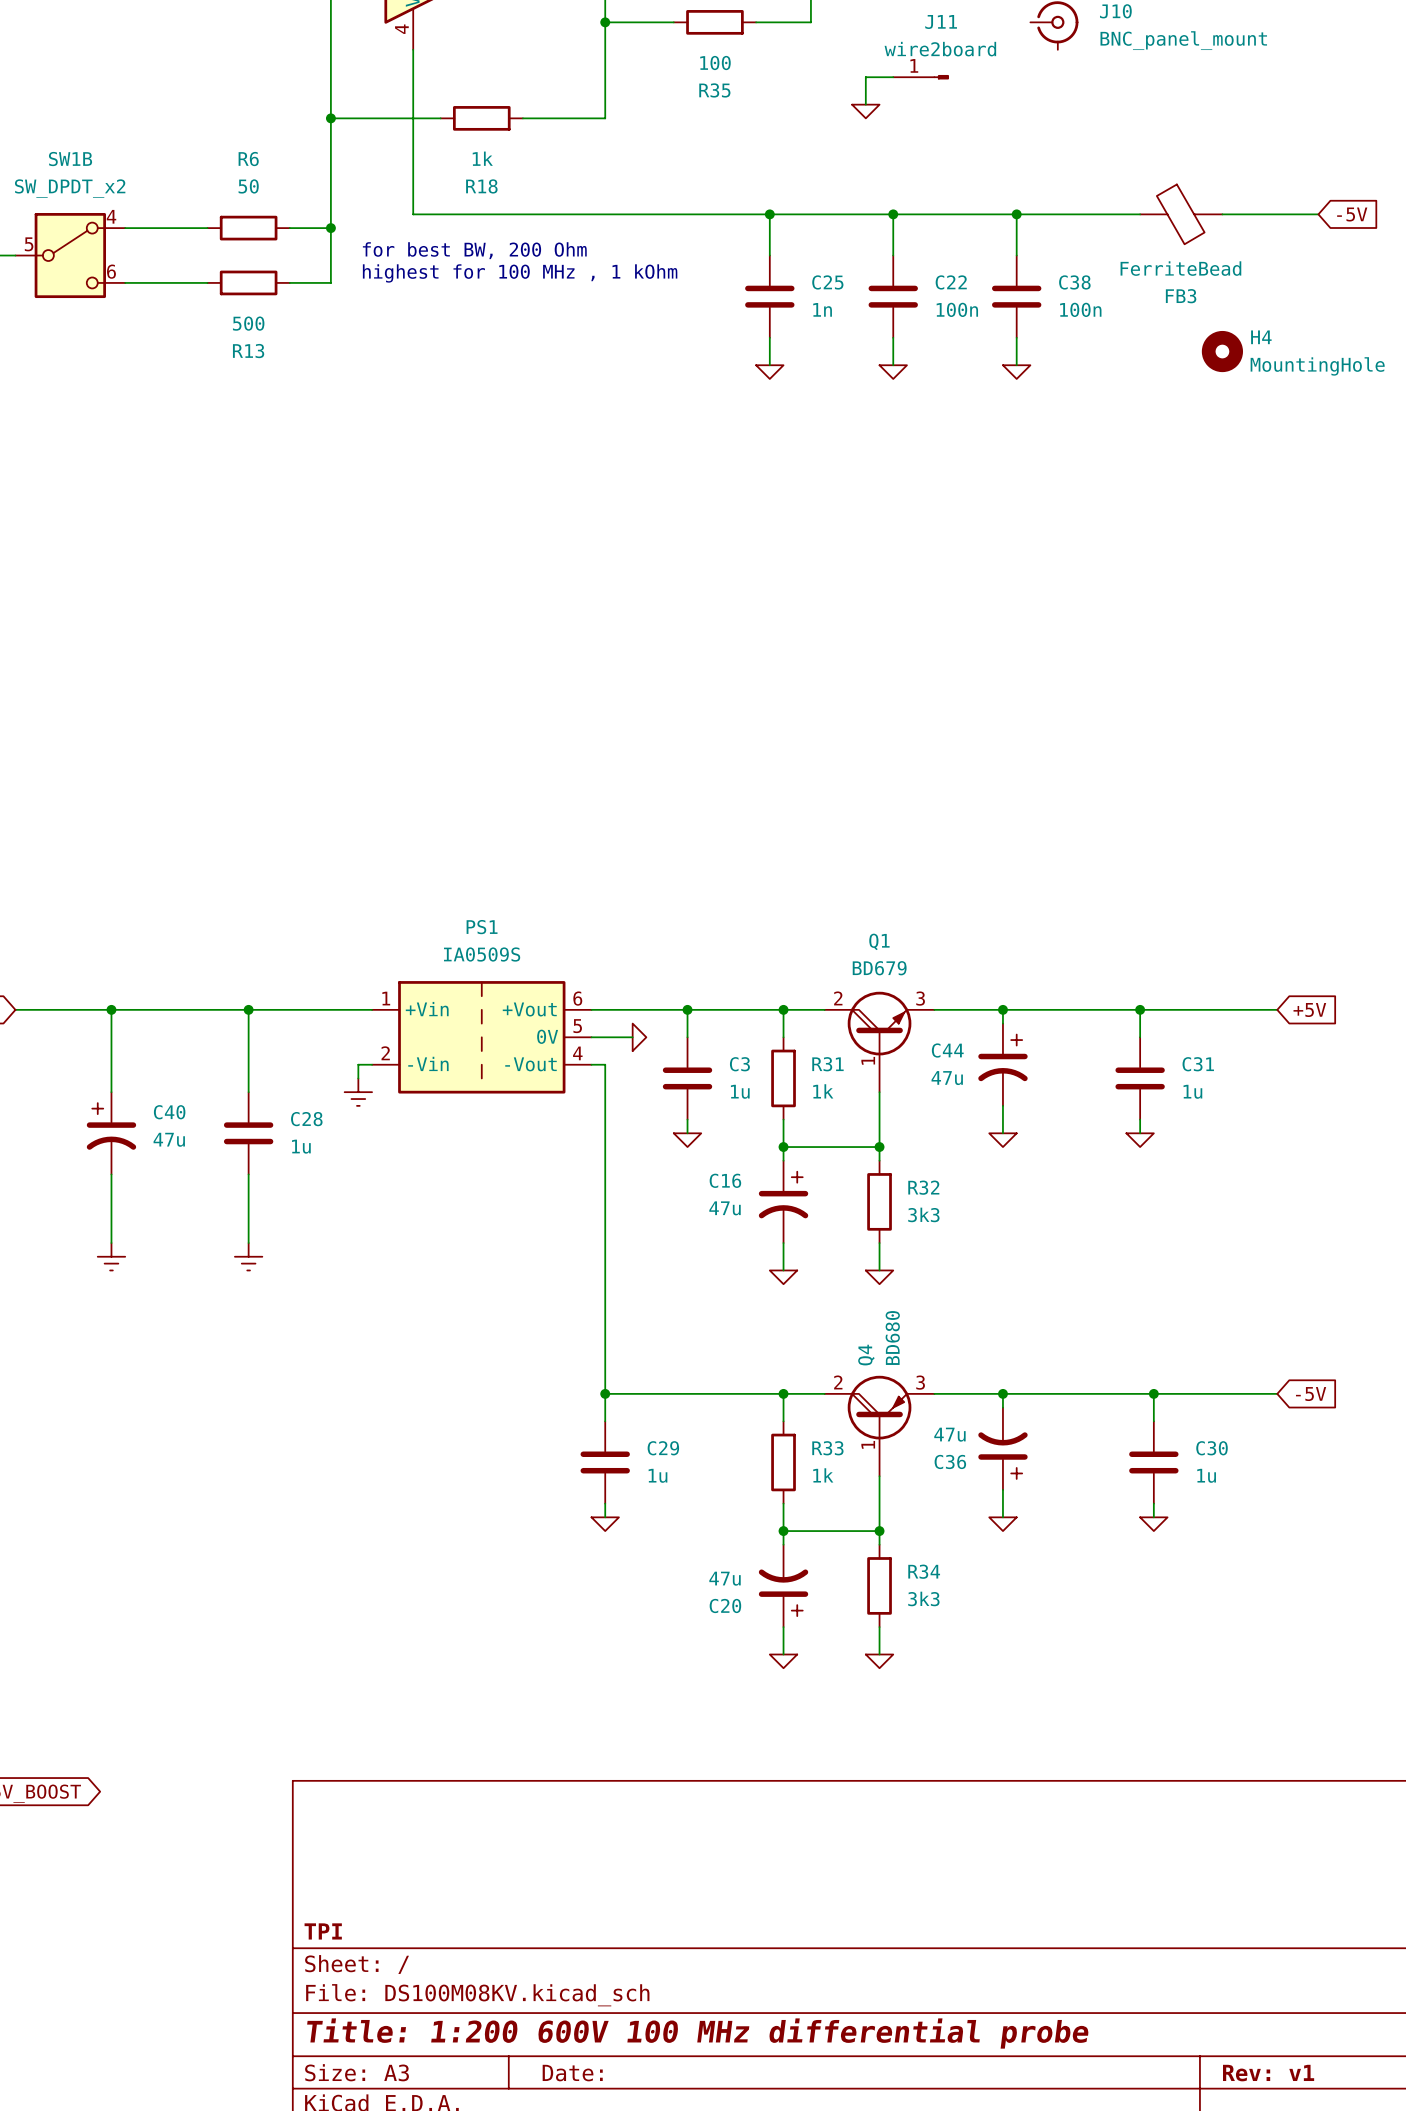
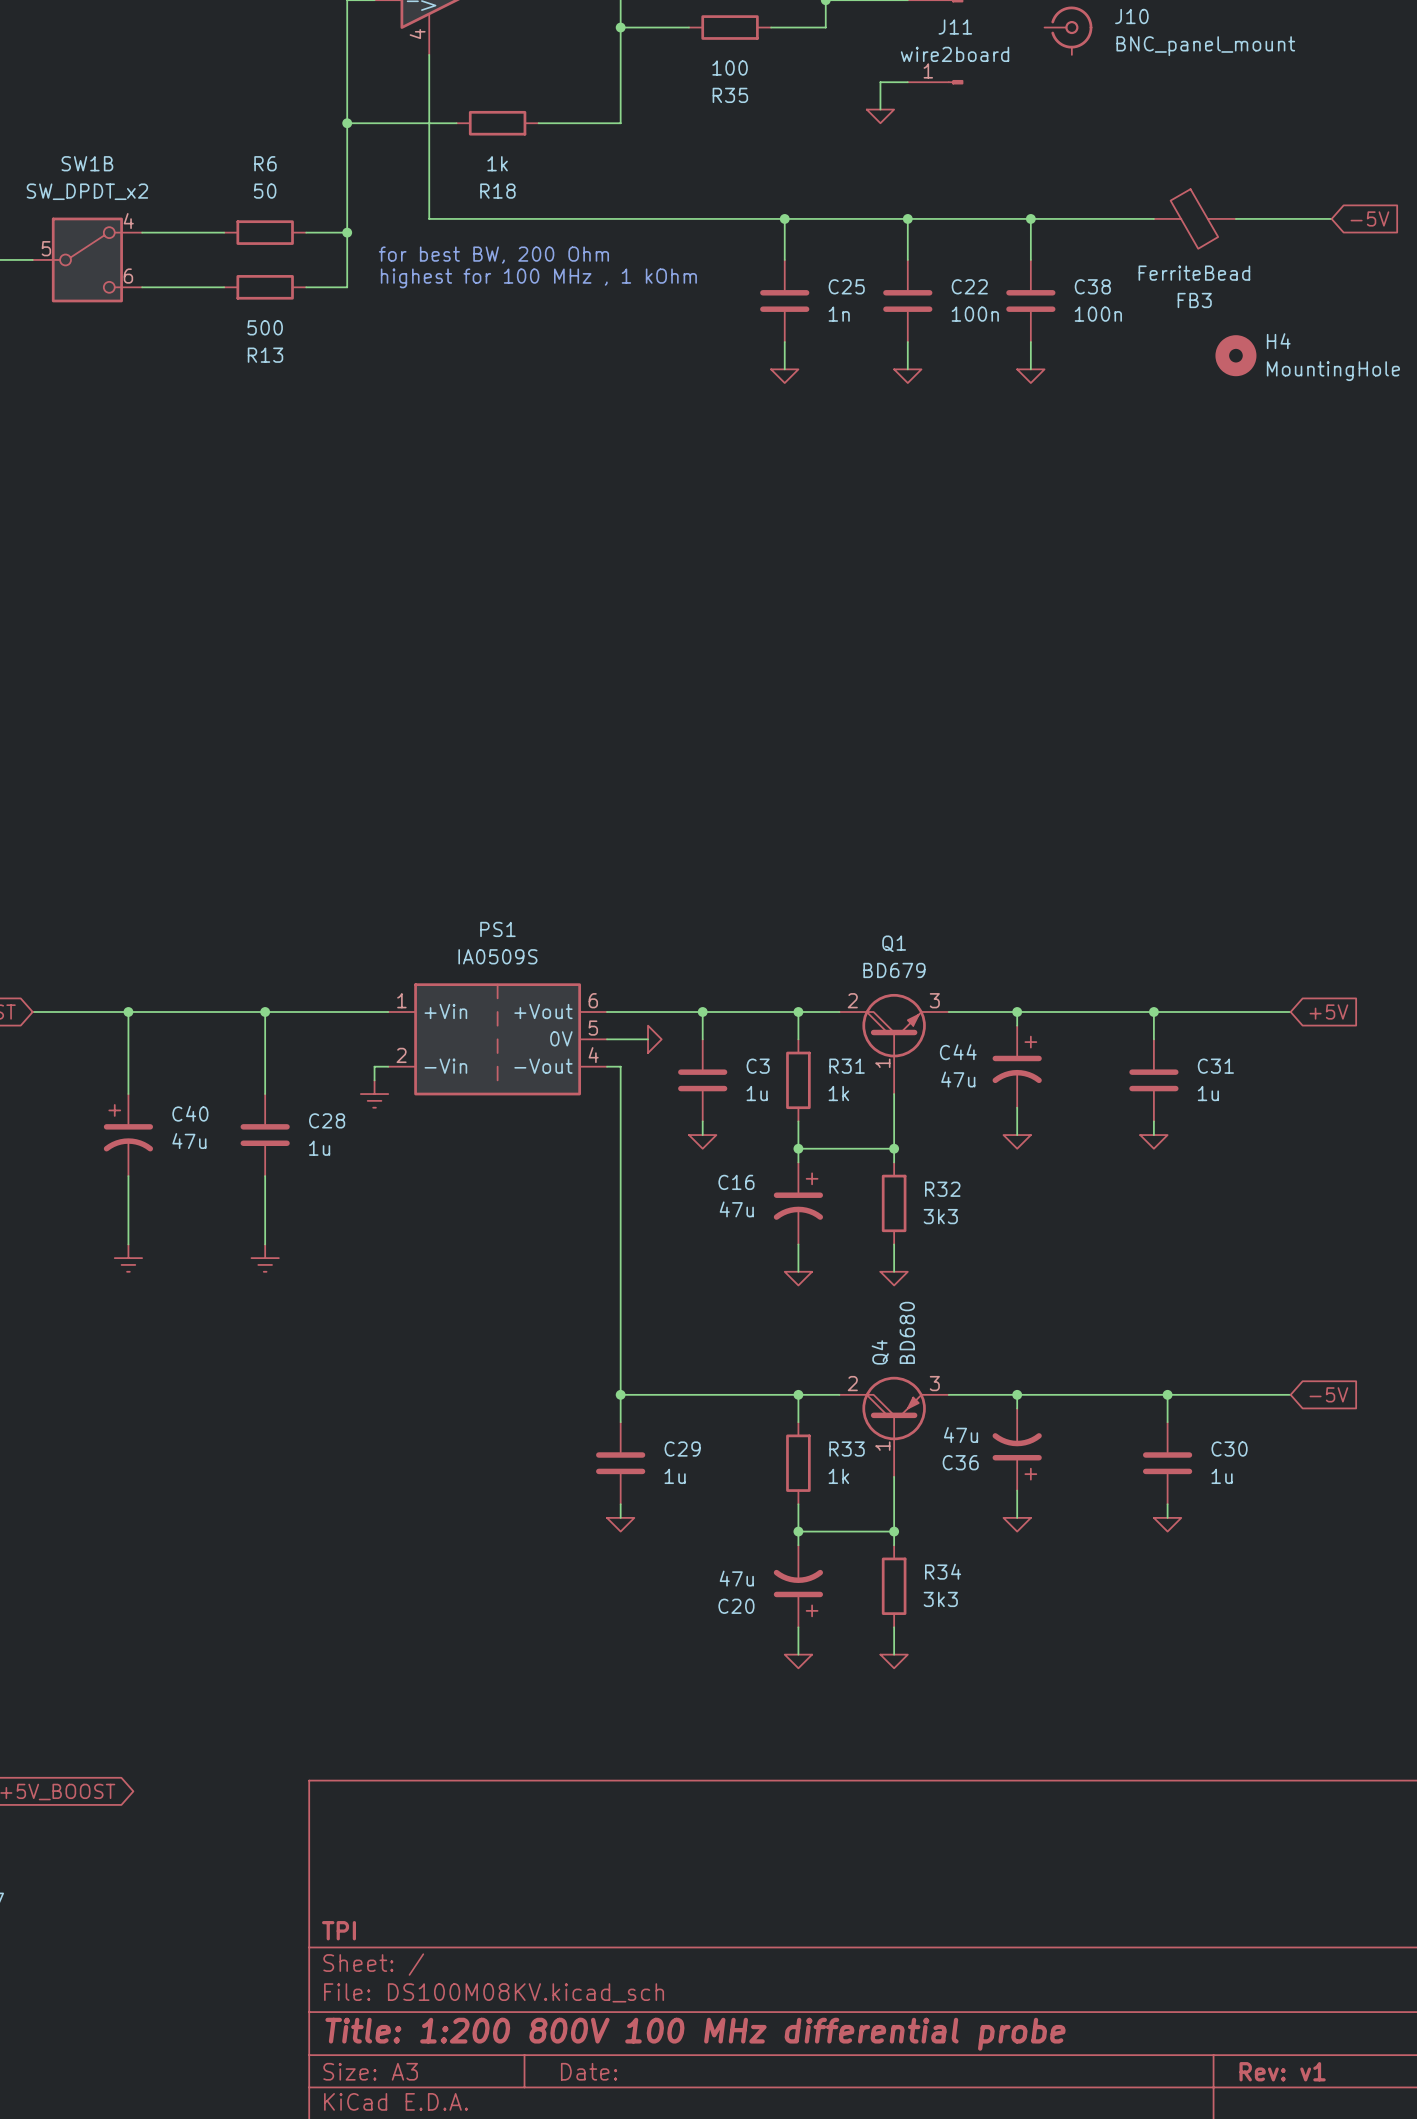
title block: Title: 1:200 600V 100 MHz differential probe (697, 2033) -> Title: 1:200 800V 100 MHz differential probe (695, 2034)

